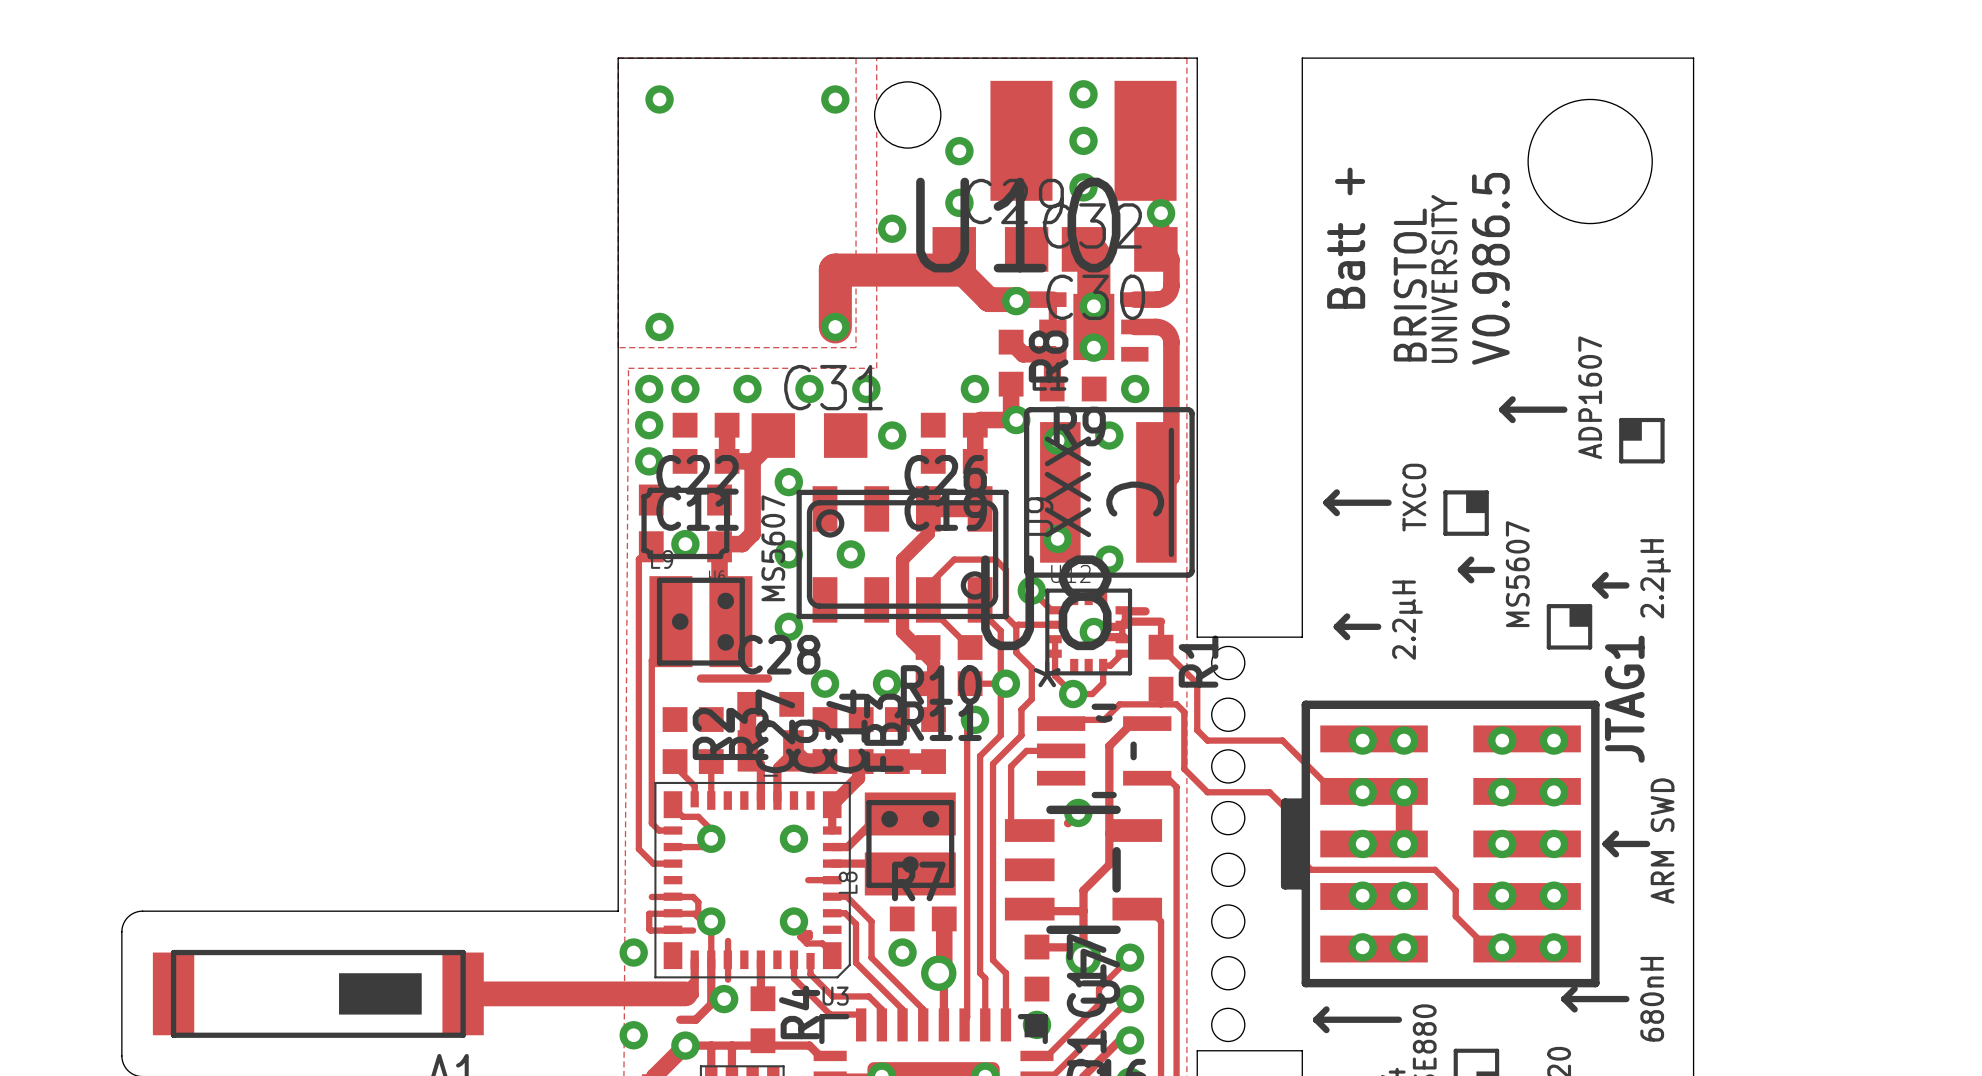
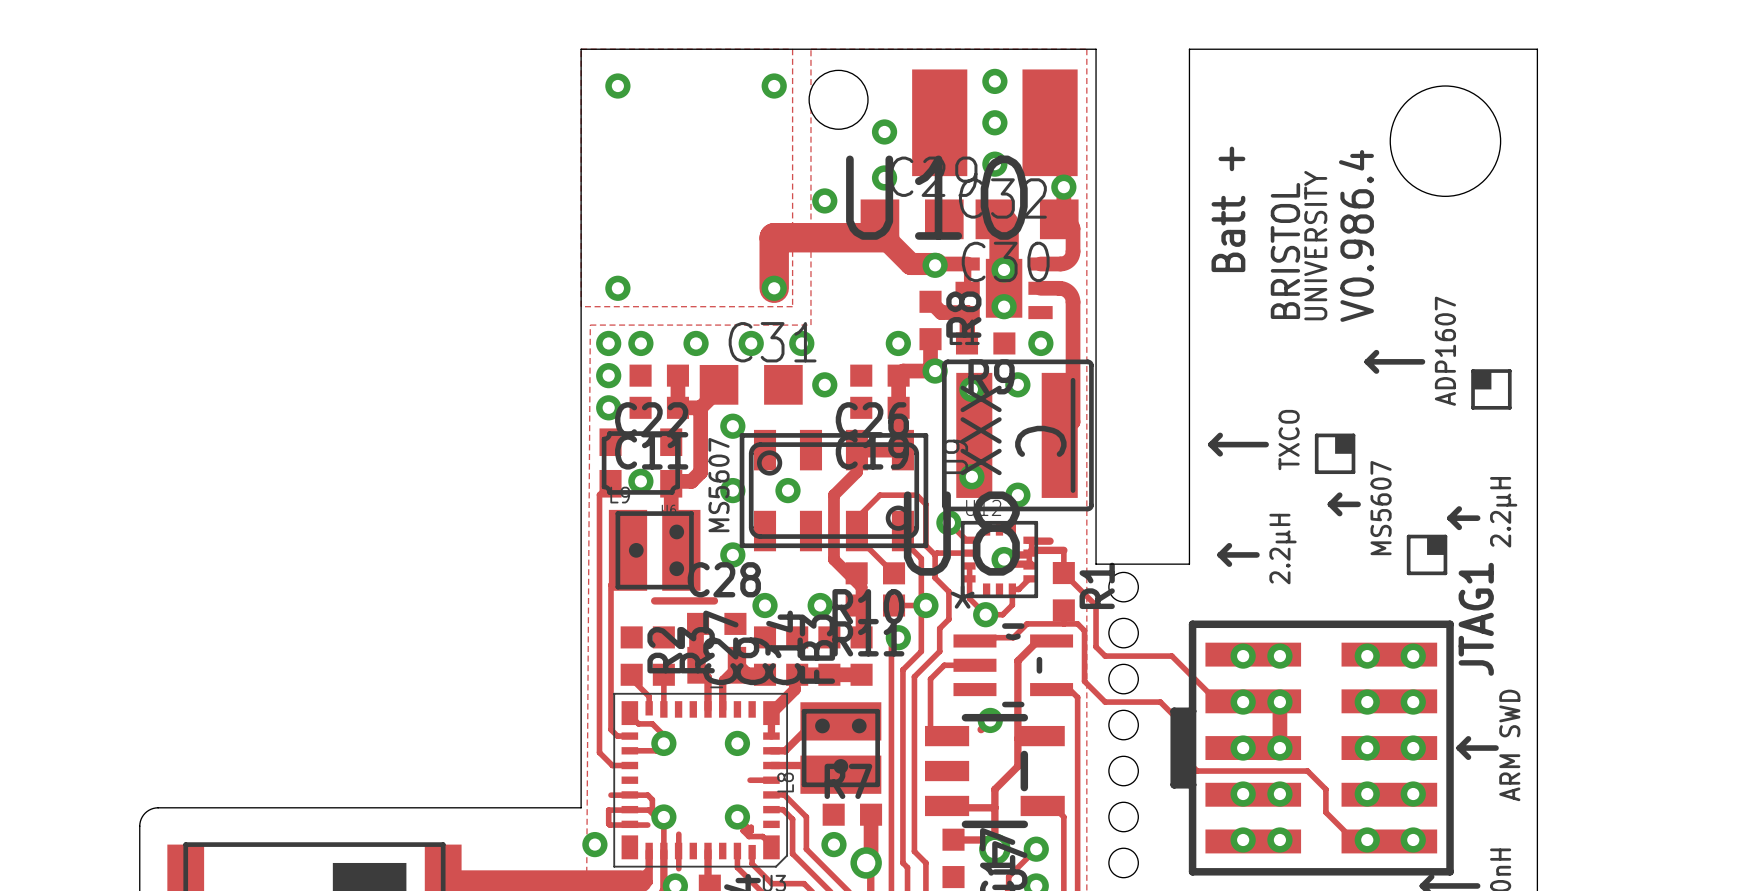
text: V0.986.5 (1490, 268) -> V0.986.4 (1356, 235)

